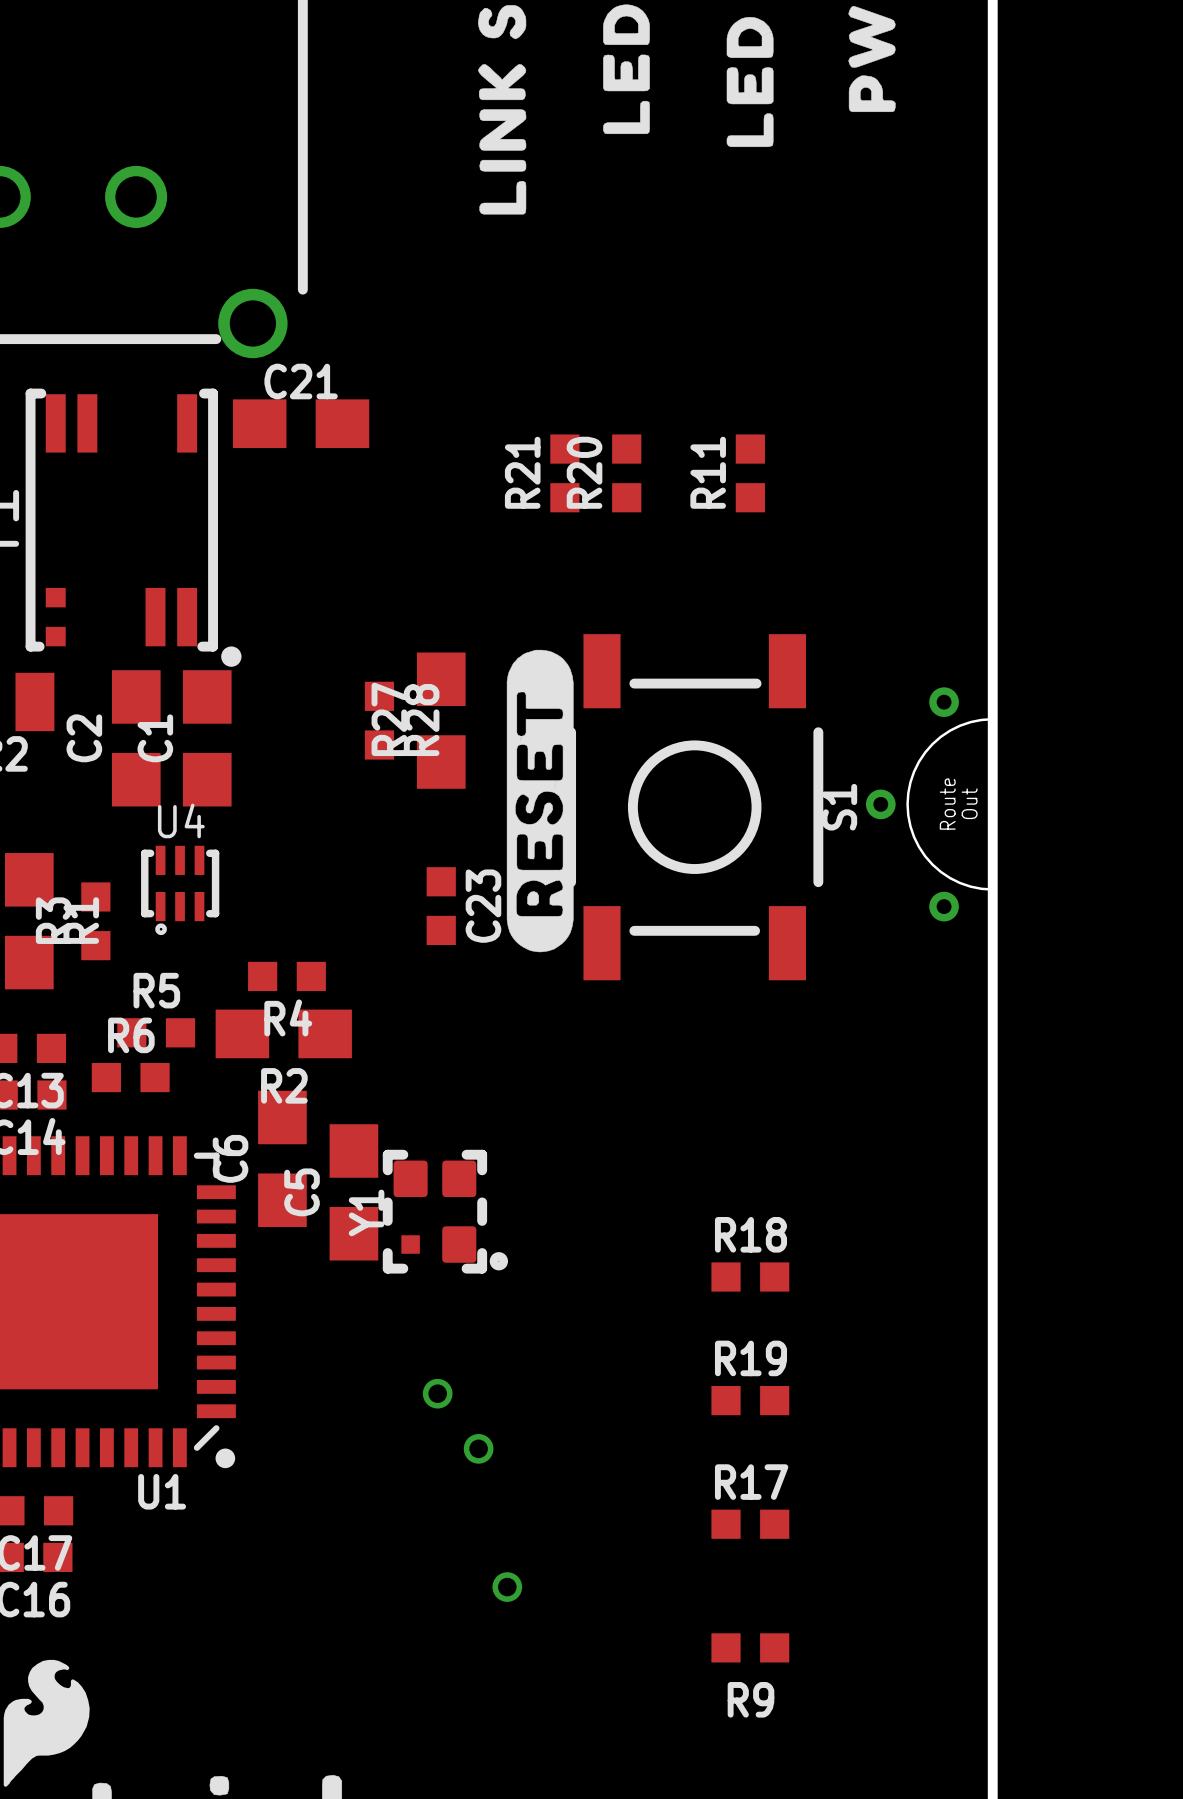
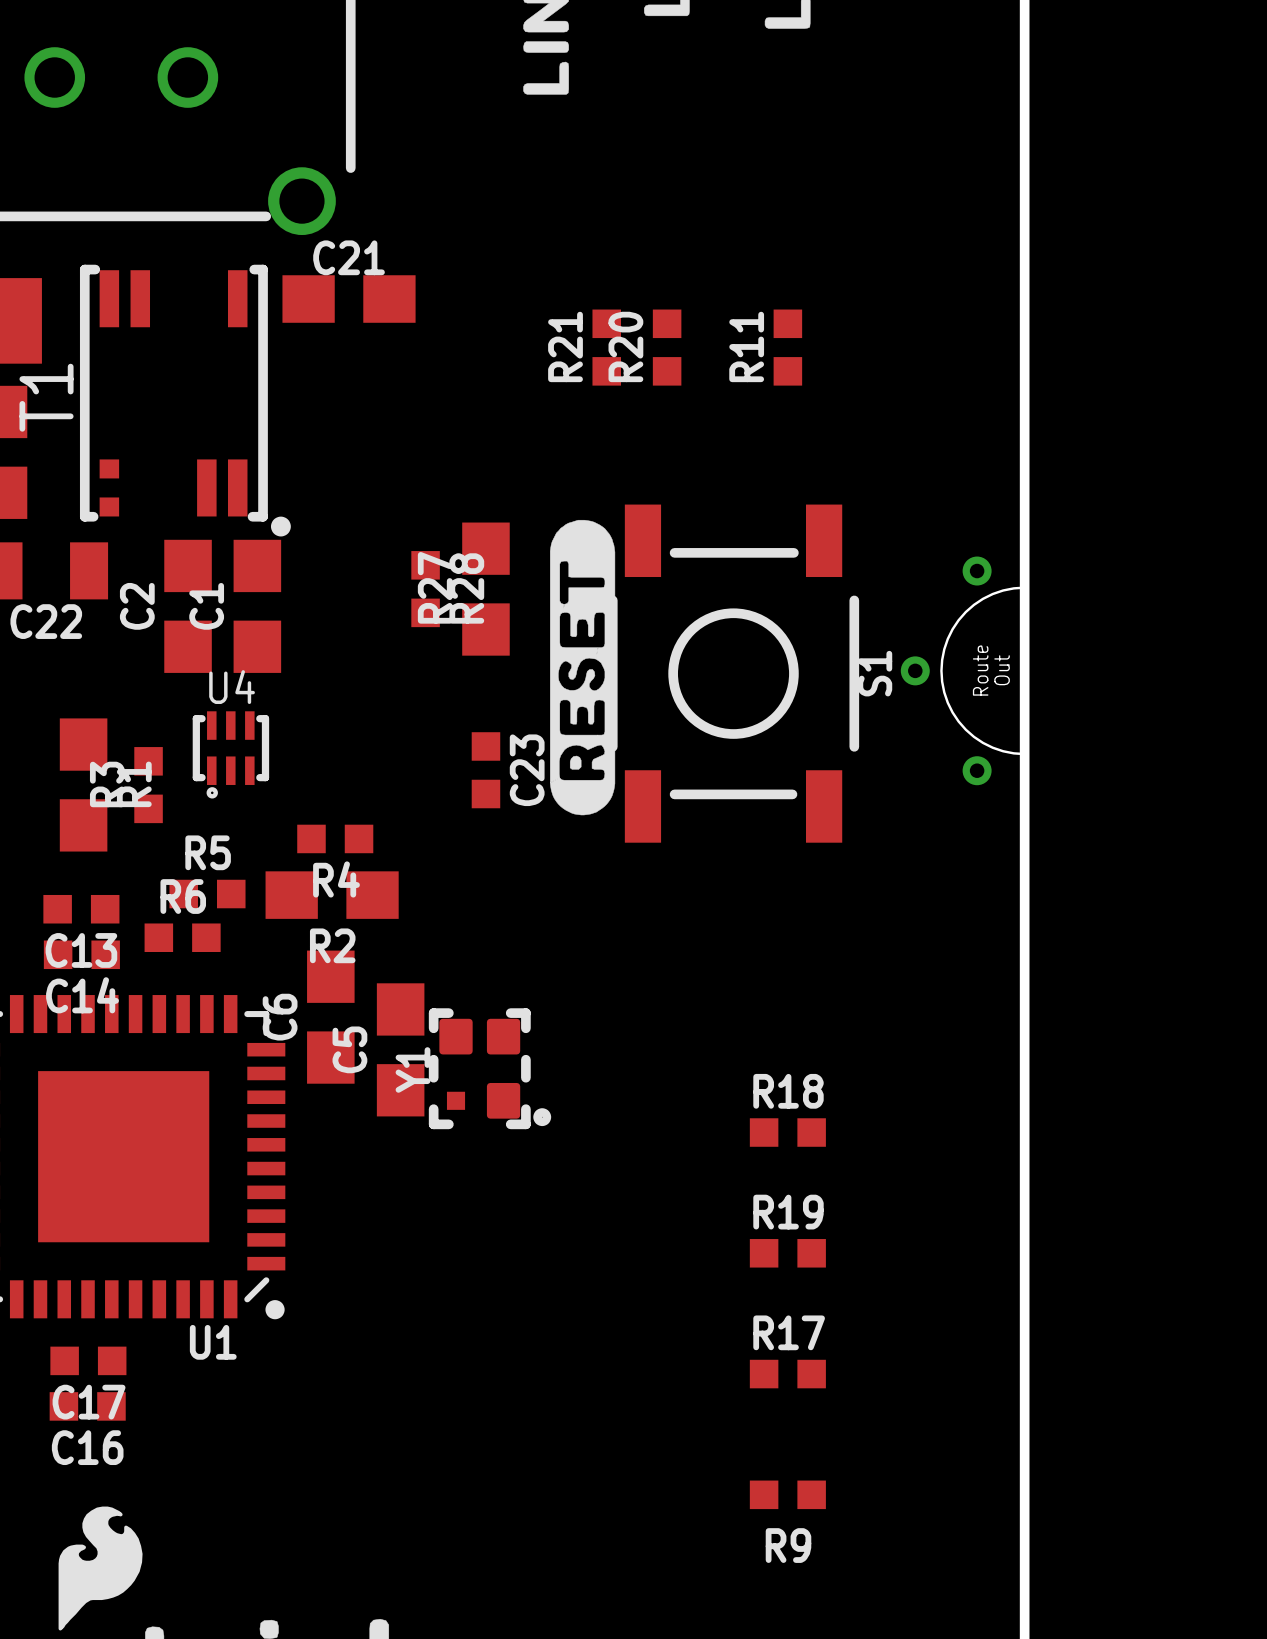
part: (437, 1393) -> none
part: (478, 1448) -> none
part: (507, 1587) -> none

